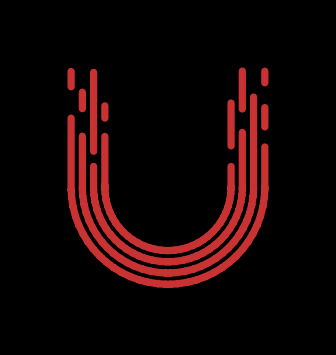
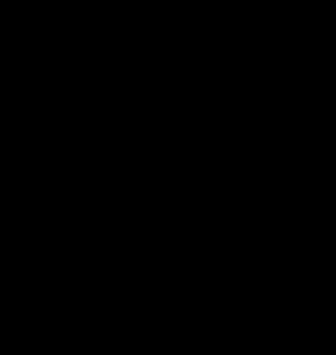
part: (167, 177) -> none

